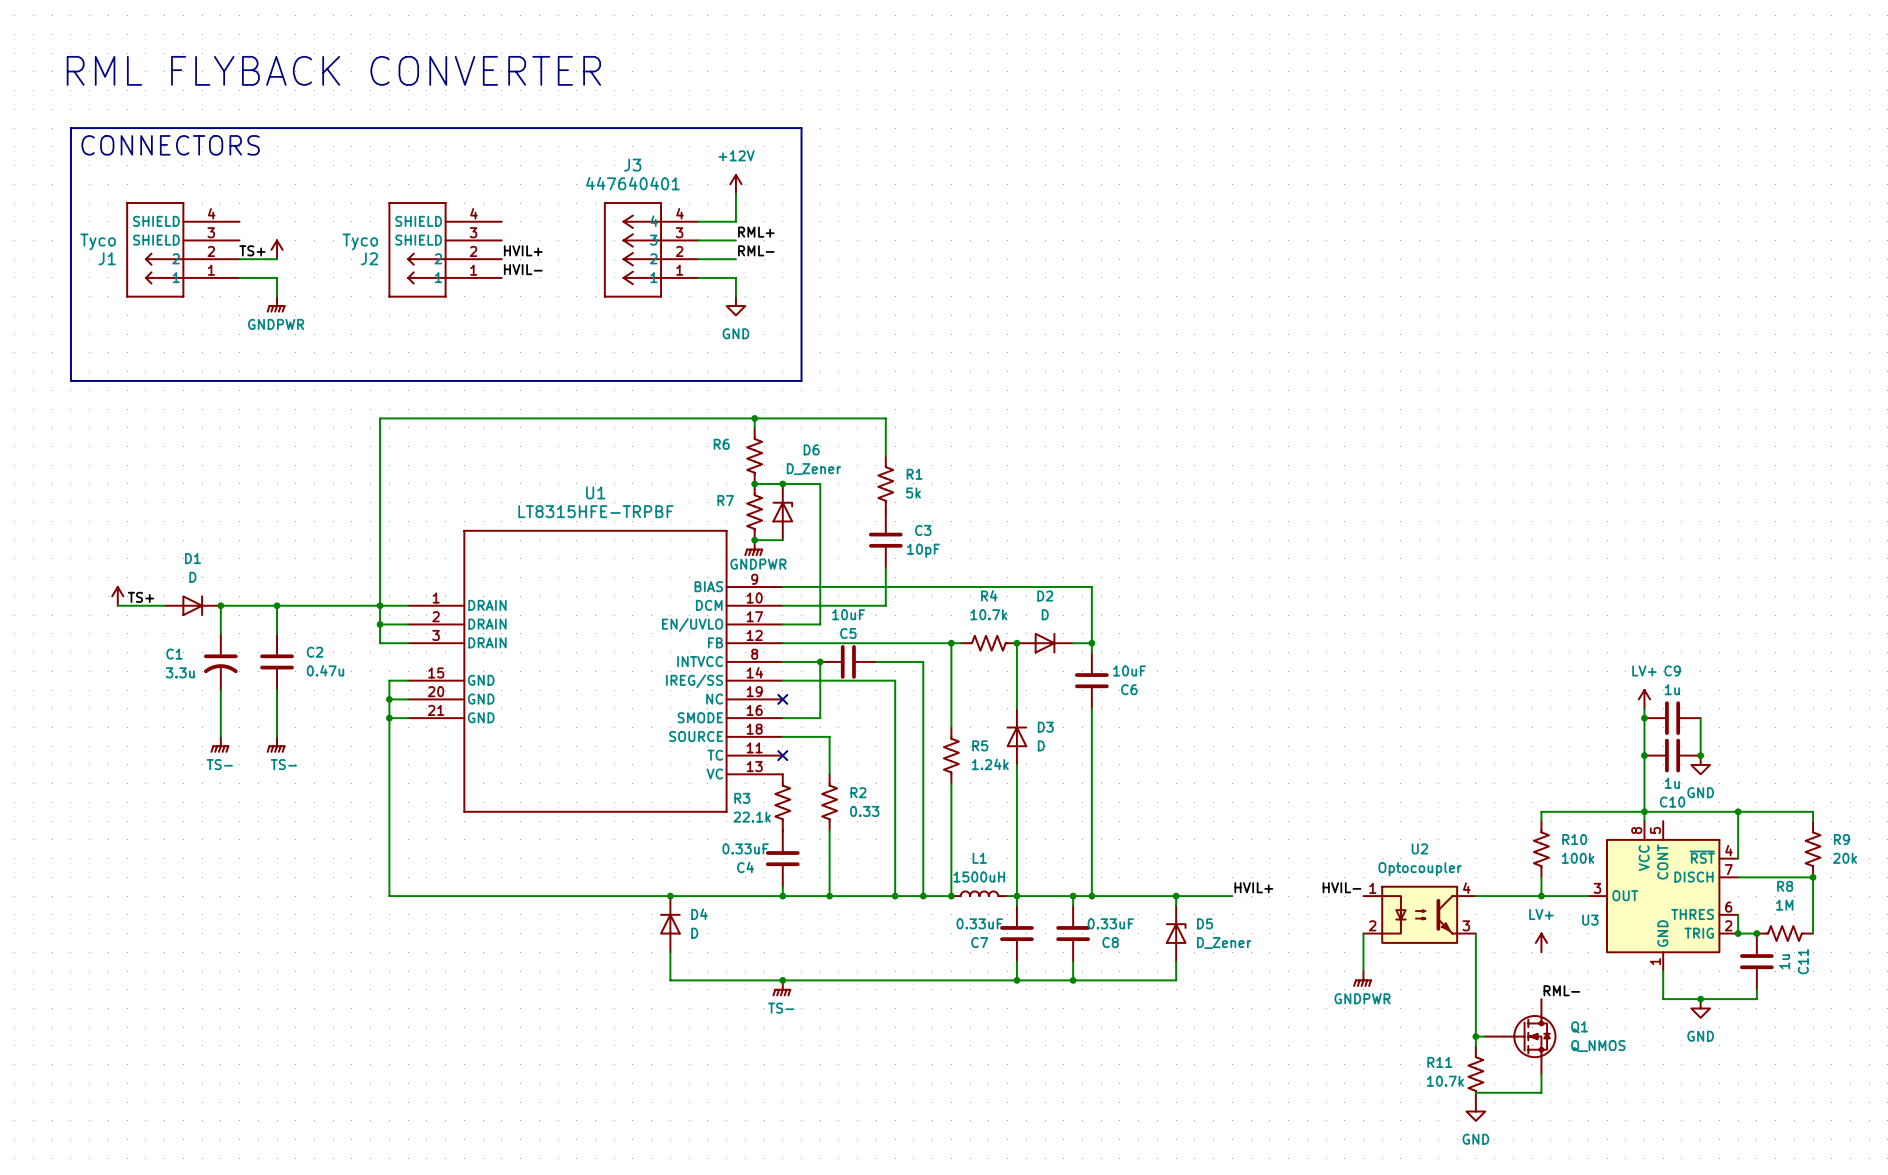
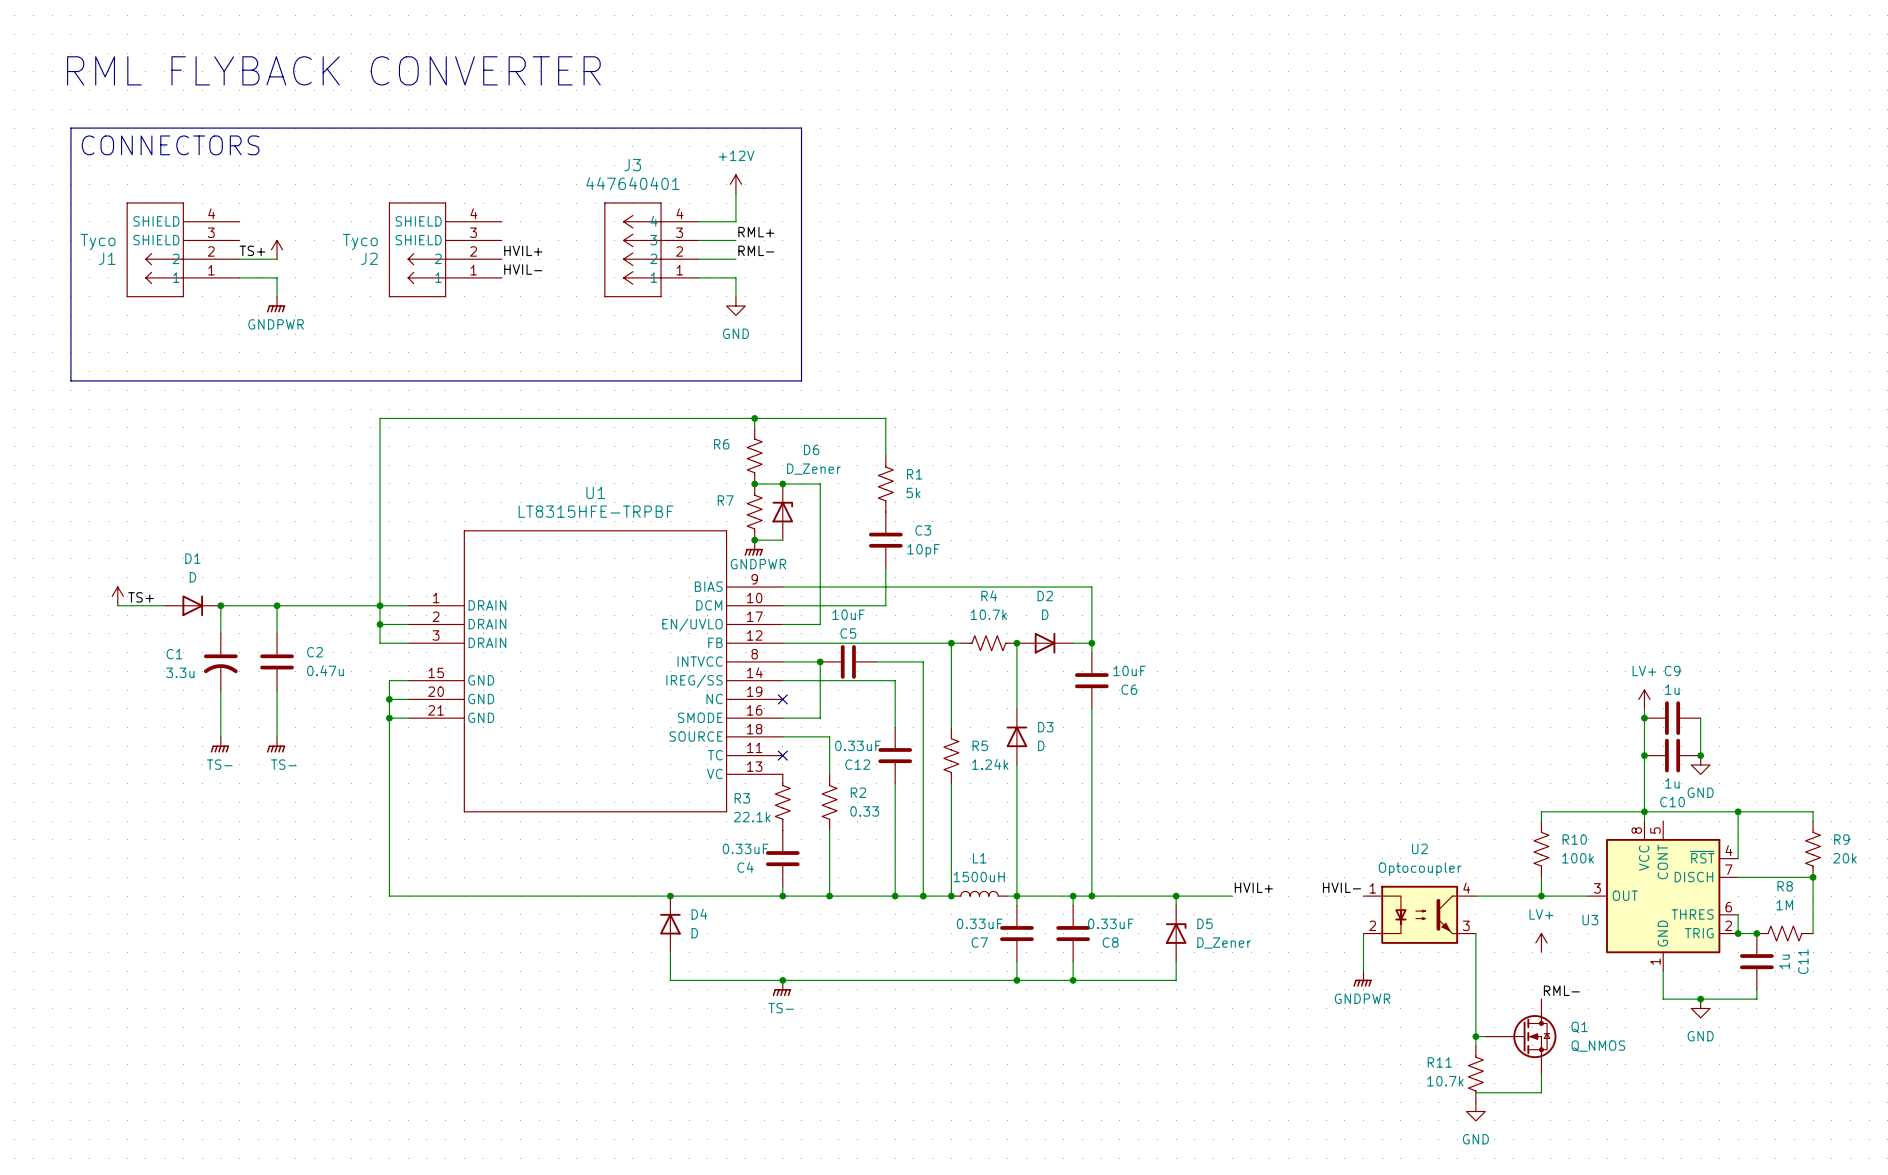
C12: none -> 0.33uF (895, 755)

